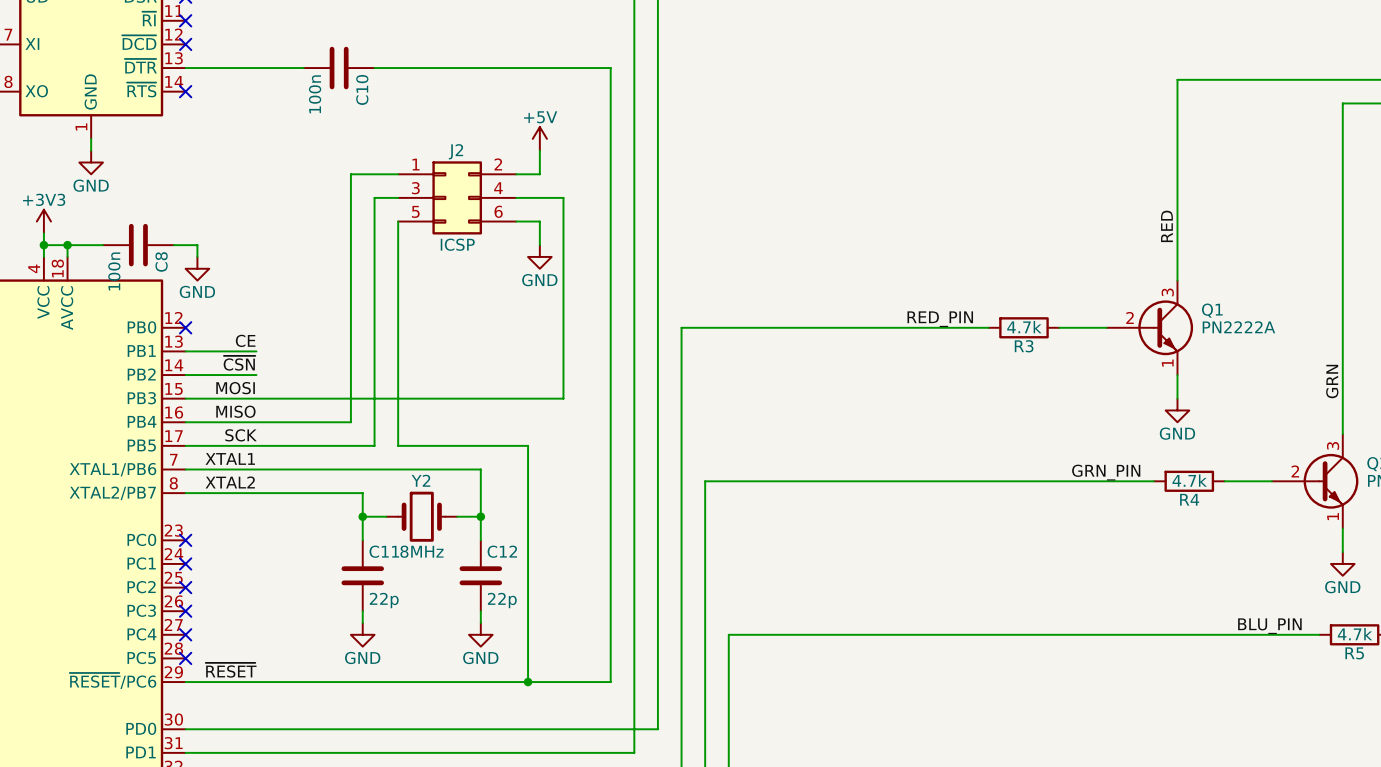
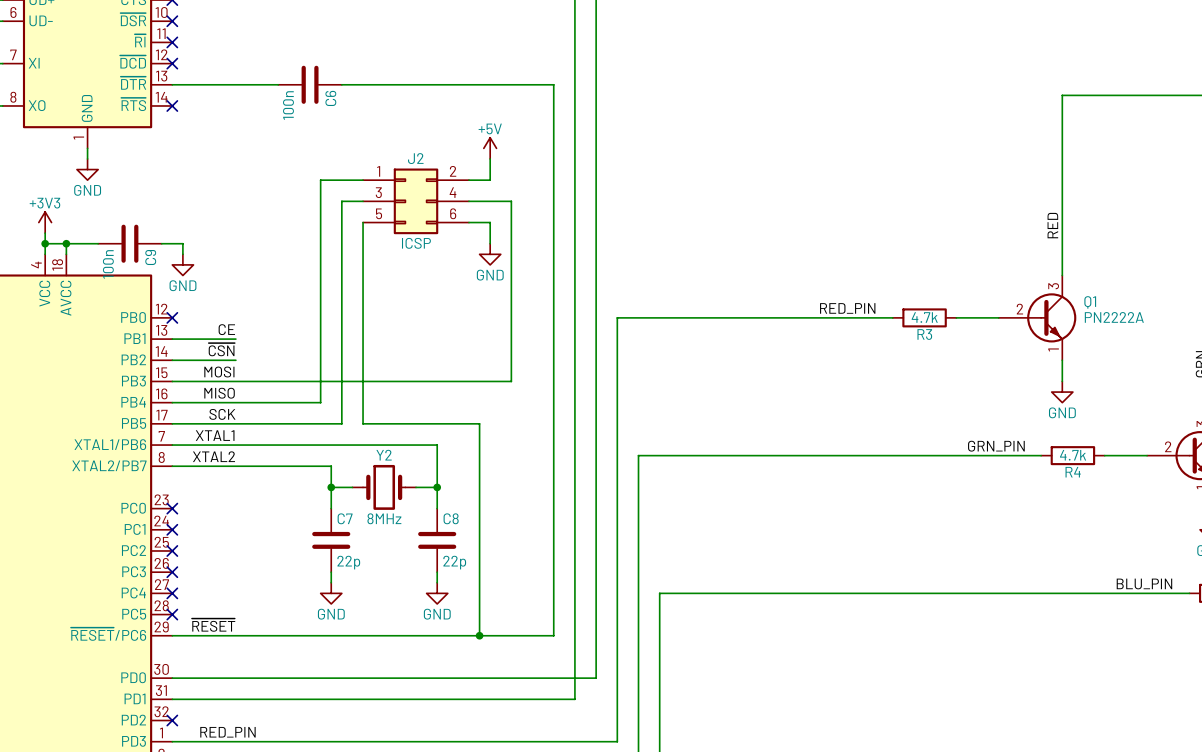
C10 name: C10 (362, 89) -> C6 (330, 98)
C8 name: C8 (161, 261) -> C9 (150, 257)
C11 name: C11 (384, 551) -> C7 (345, 518)
C12 name: C12 (502, 551) -> C8 (451, 518)

